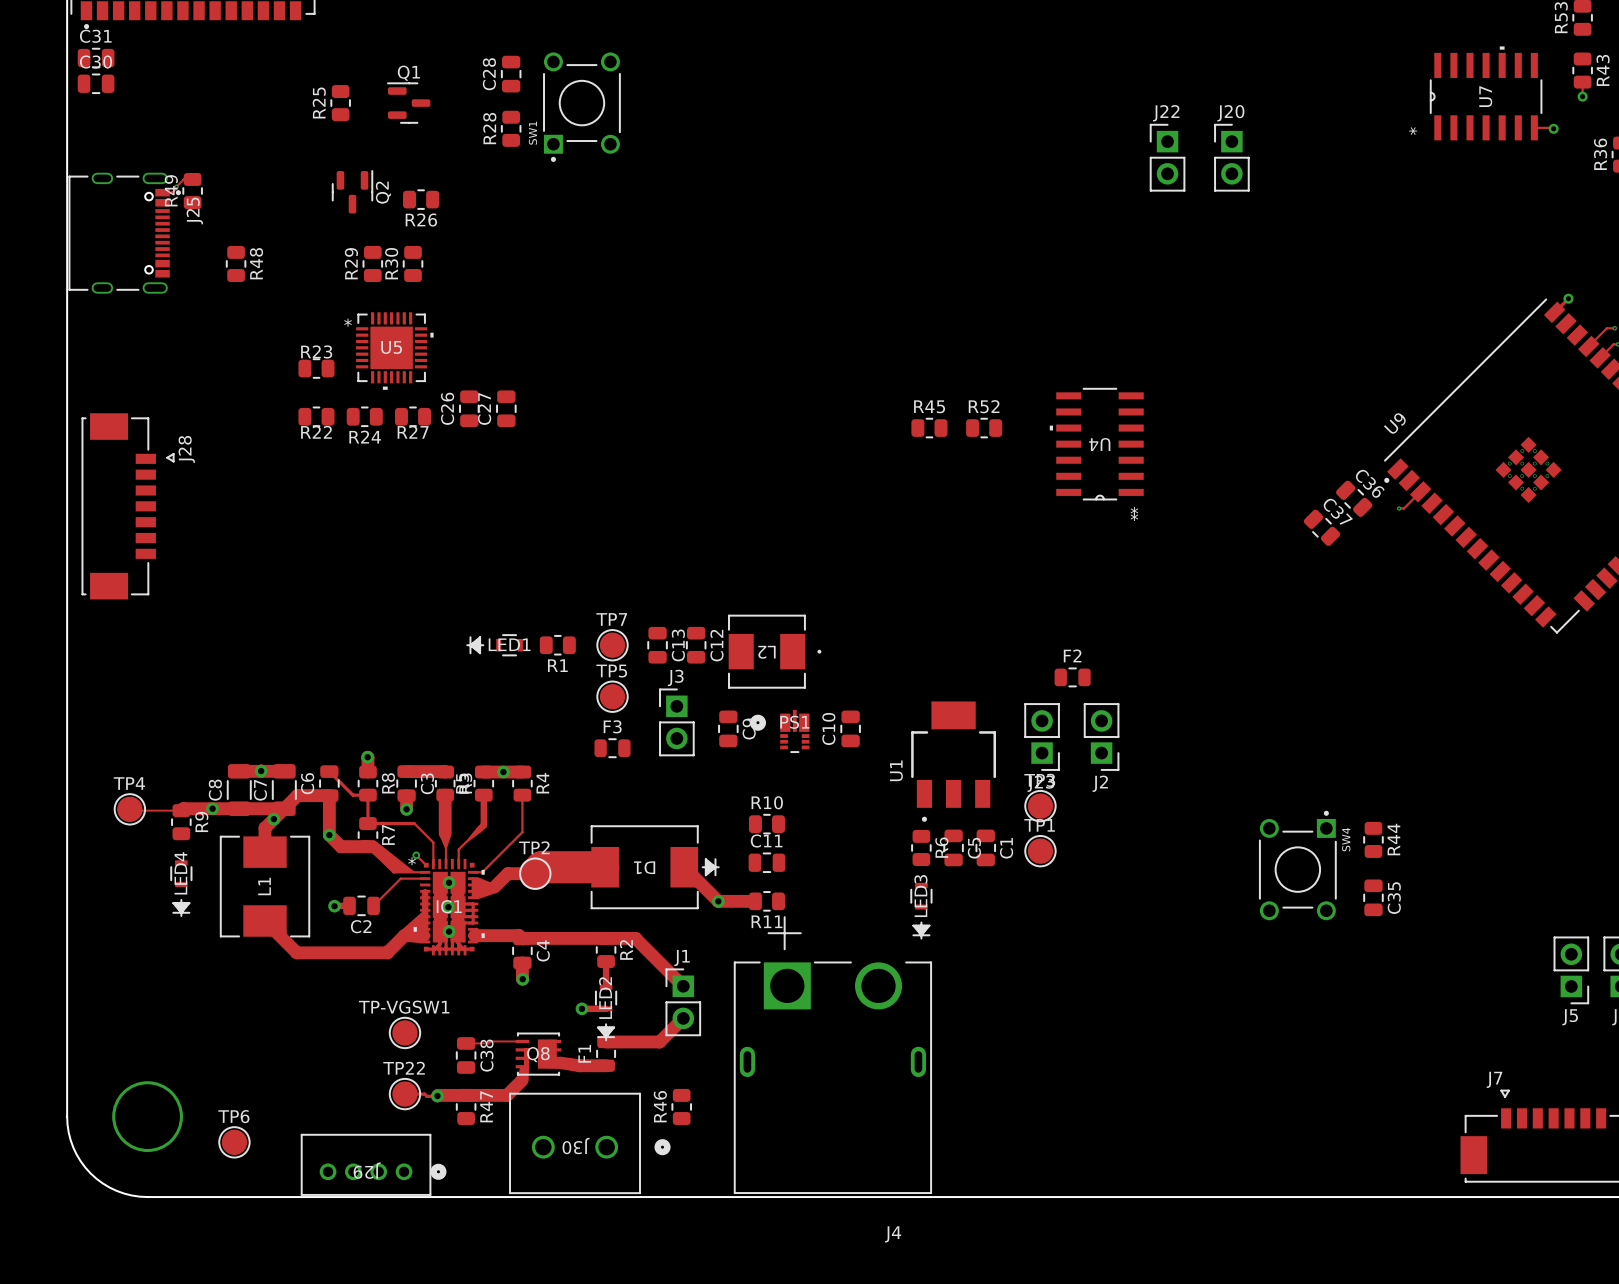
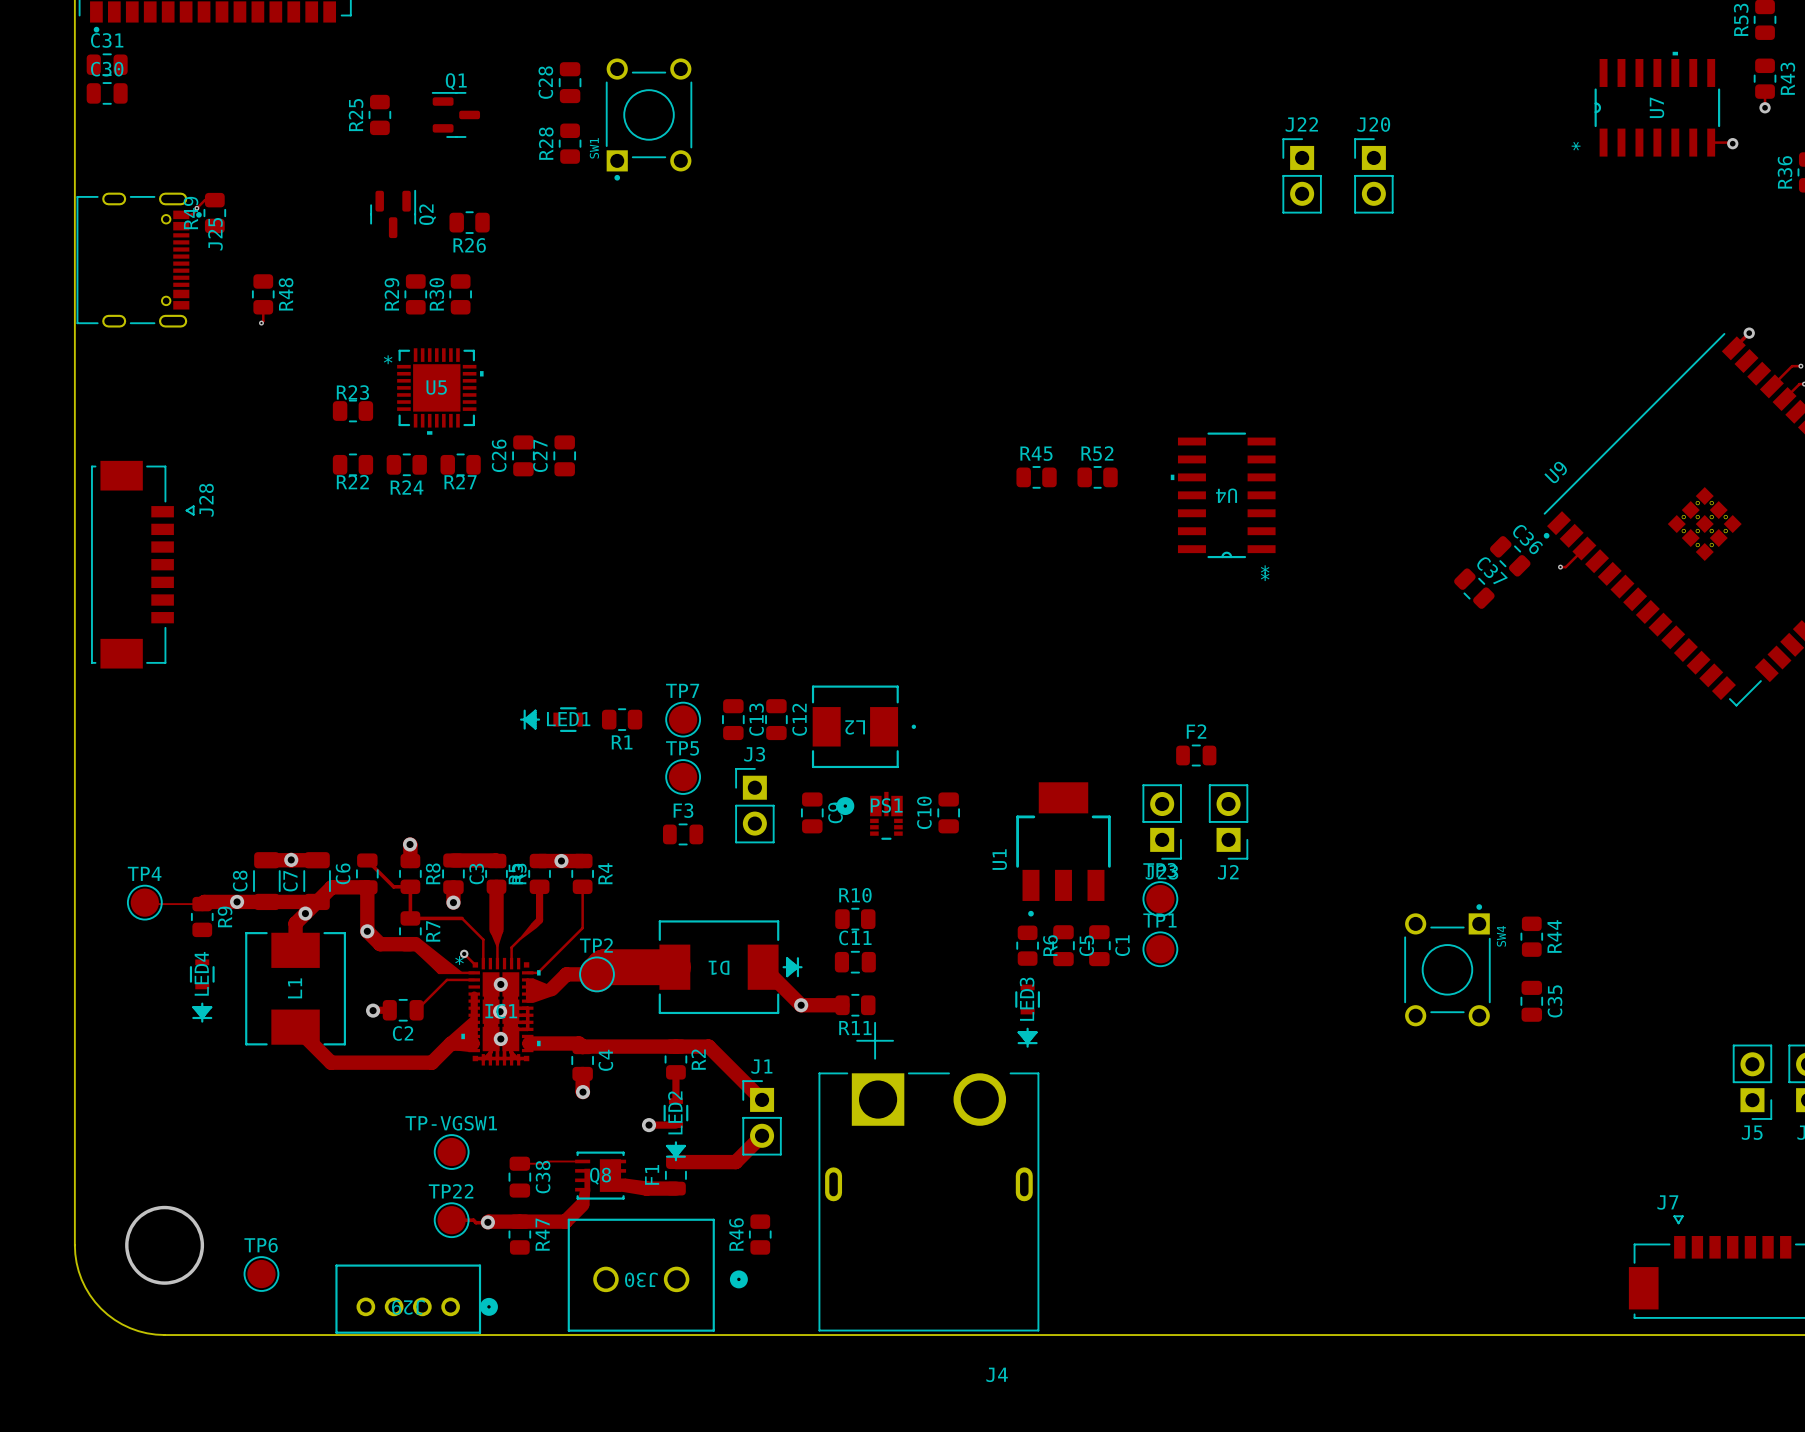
track: none -> (263, 307) (263, 321) (261, 323)
via: none -> (261, 323)

